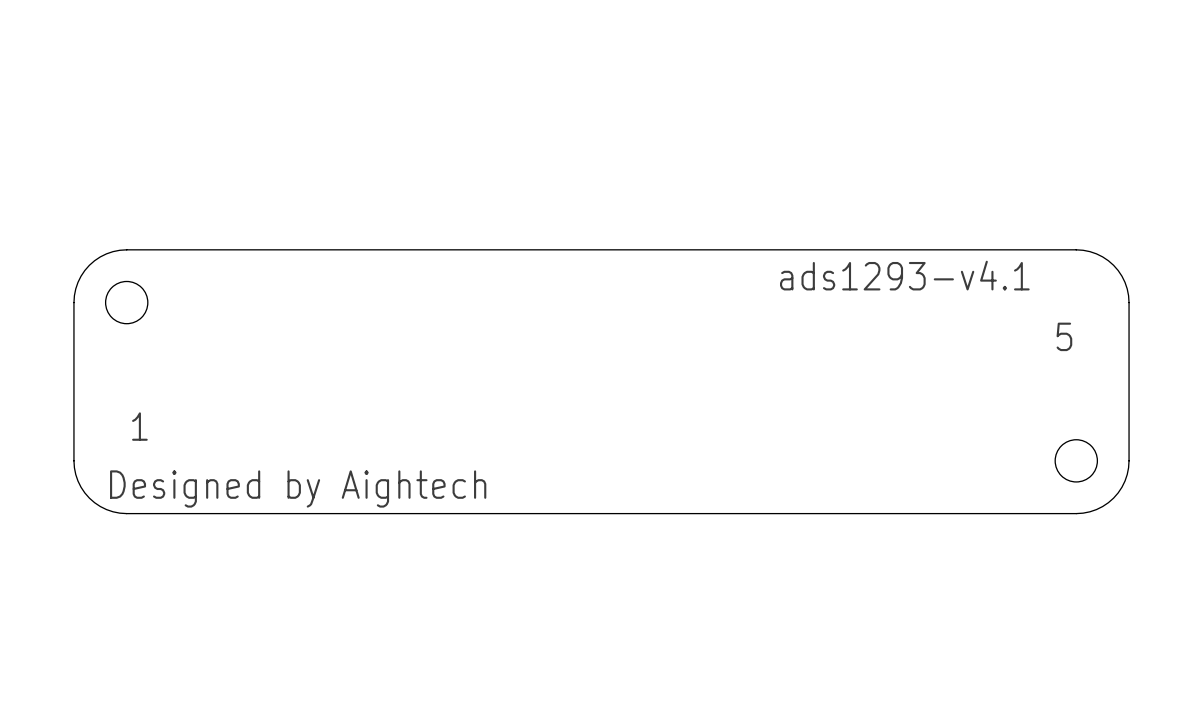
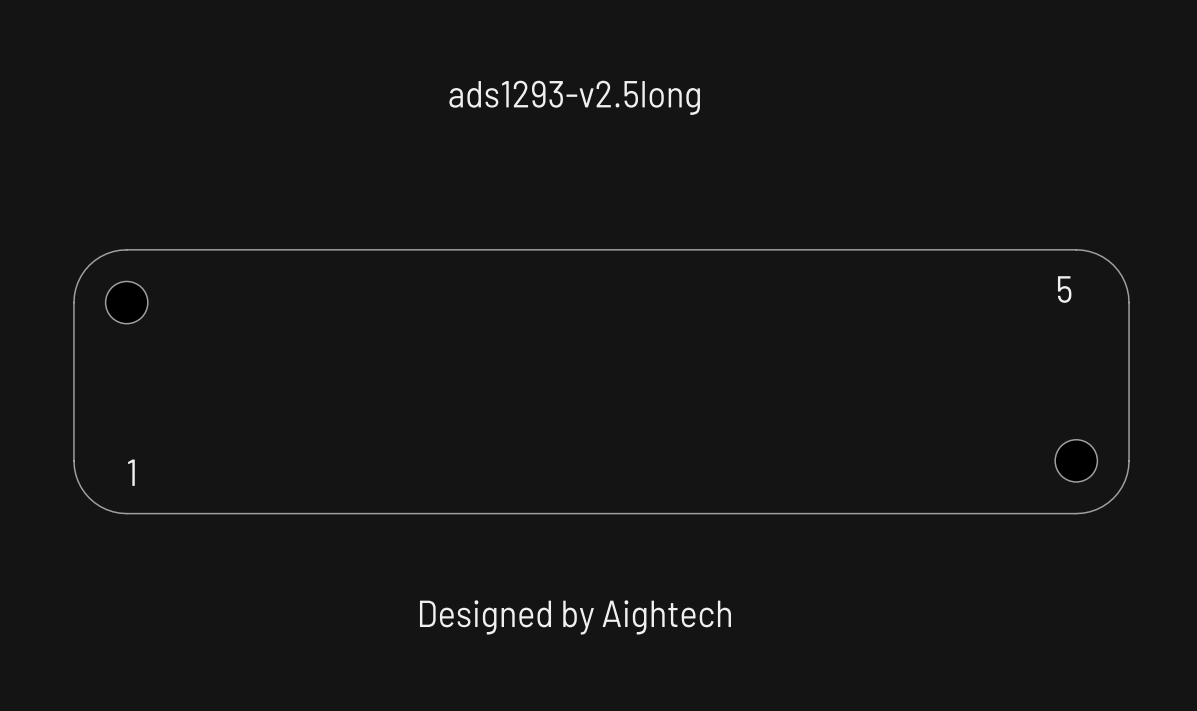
text: none -> ads1293-v2.5long (574, 97)
text: ads1293-v4.1 (904, 275) -> none
text position: 5 (1064, 336) -> 5 (1064, 289)
text position: 1 (139, 426) -> 1 (131, 472)
text position: Designed by Aightech (298, 488) -> Designed by Aightech (575, 617)

